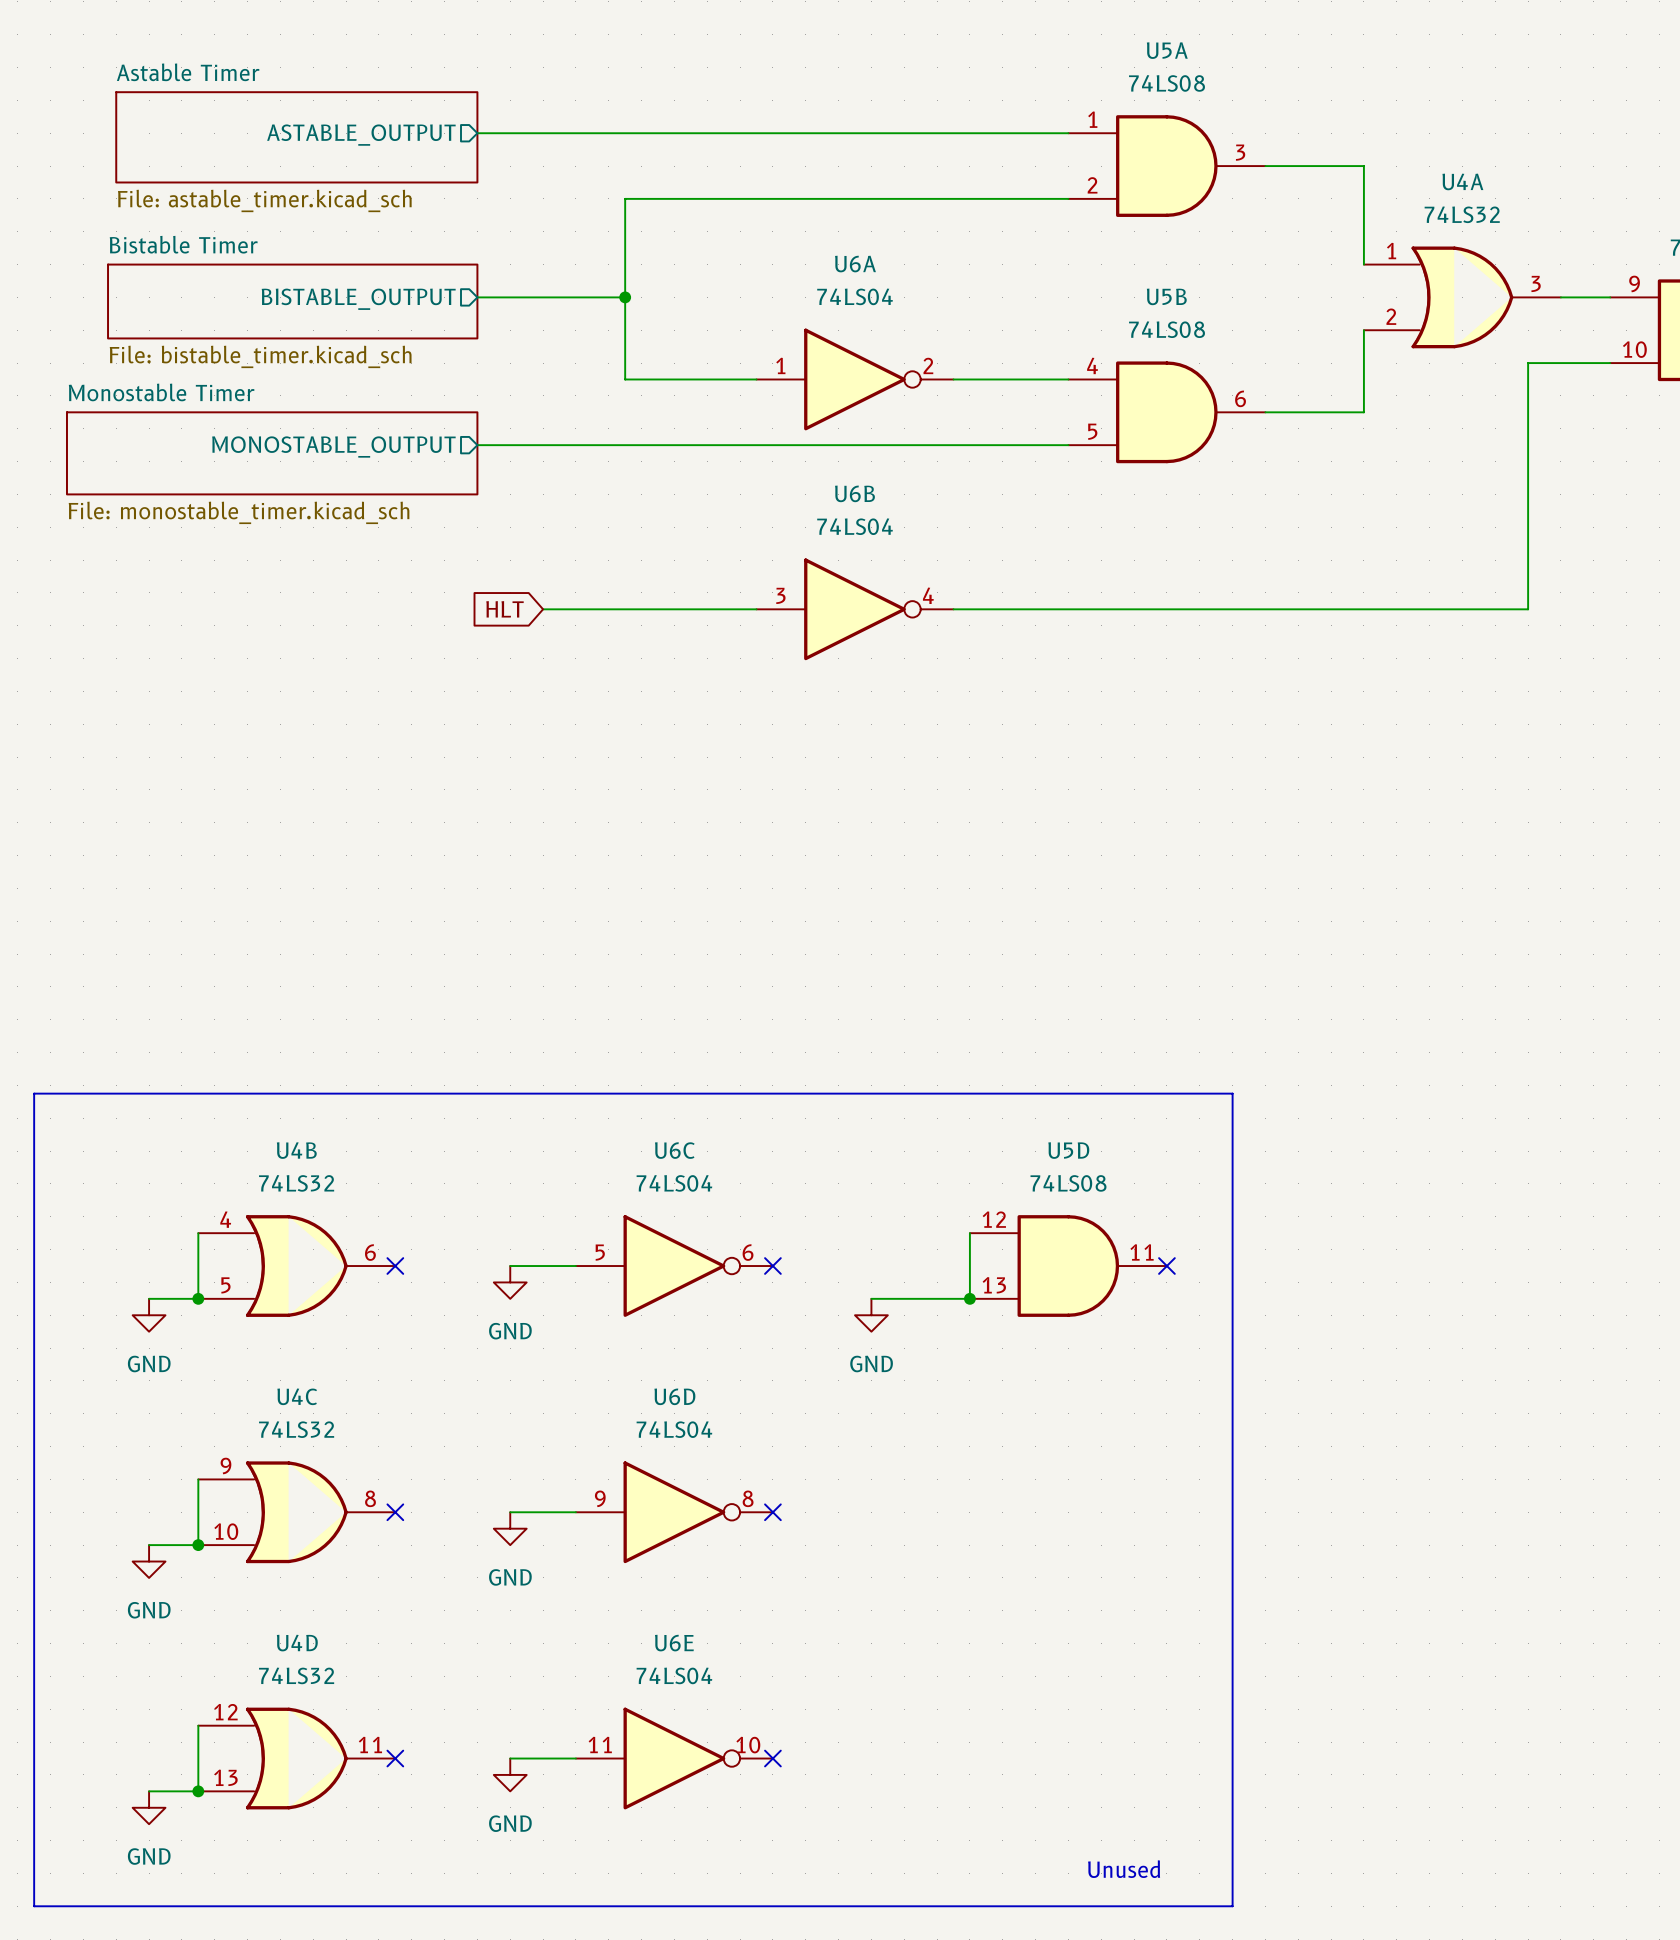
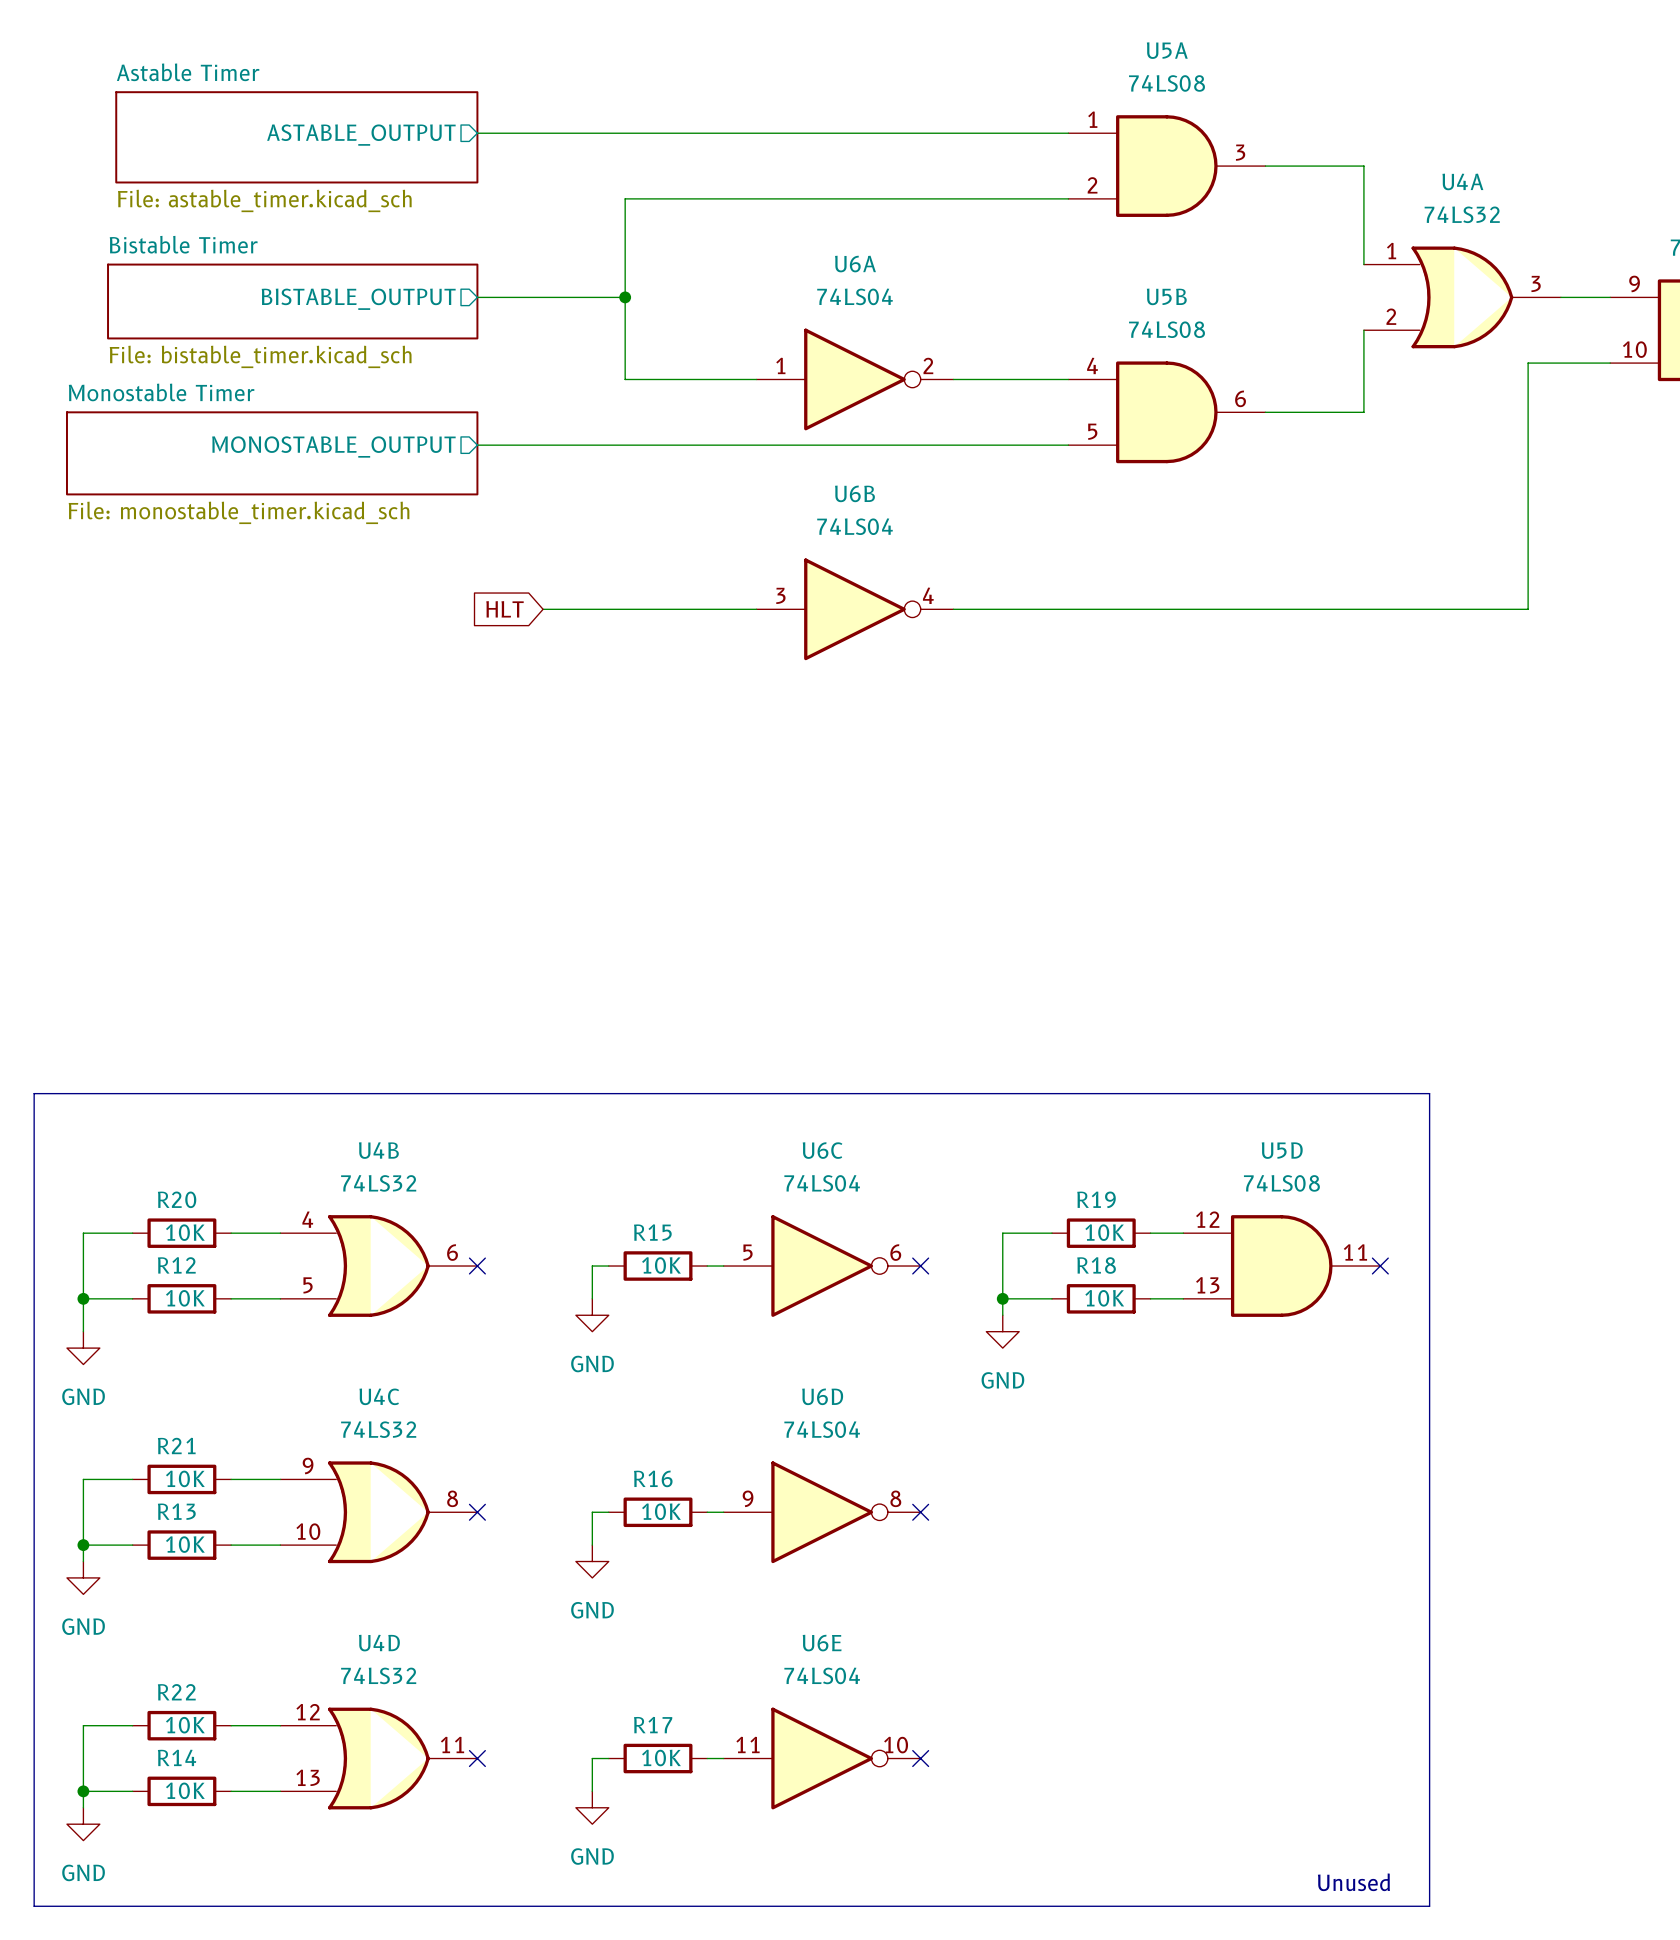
line: (1232, 1093) (1232, 1906) -> (1232, 1093) (1429, 1093) (1429, 1906) (1232, 1906)
wire: none -> (132, 1233) (83, 1233) (83, 1331)
R20: none -> 10K (181, 1233)
wire: (198, 1233) (198, 1298) (149, 1298) -> none
wire: (969, 1233) (969, 1298) (871, 1298) -> none
wire: none -> (1052, 1233) (1002, 1233) (1002, 1315)
R19: none -> 10K (1101, 1233)
wire: none -> (1150, 1233) (1183, 1233)
U4B position: (296, 1266) -> (378, 1266)
no-connect mark: (395, 1266) -> none
no-connect mark: none -> (477, 1266)
wire: (510, 1266) (575, 1266) -> none
wire: none -> (608, 1266) (592, 1266) (592, 1298)
R15: none -> 10K (658, 1266)
U6C position: (674, 1266) -> (822, 1266)
no-connect mark: (772, 1266) -> none
no-connect mark: none -> (920, 1266)
U5D position: (1068, 1266) -> (1281, 1266)
no-connect mark: (1166, 1266) -> none
no-connect mark: none -> (1380, 1266)
power symbol position: GND (510, 1282) -> GND (592, 1315)
wire: none -> (83, 1298) (132, 1298)
junction: none -> (83, 1298)
R12: none -> 10K (181, 1298)
junction: (198, 1298) -> none
junction position: (969, 1298) -> (1002, 1298)
R18: none -> 10K (1101, 1298)
wire: none -> (1150, 1298) (1183, 1298)
power symbol position: GND (149, 1315) -> GND (83, 1348)
power symbol position: GND (871, 1315) -> GND (1002, 1331)
wire: none -> (132, 1479) (83, 1479) (83, 1561)
R21: none -> 10K (181, 1479)
wire: (198, 1479) (198, 1545) (149, 1545) -> none
U4C position: (296, 1512) -> (378, 1512)
no-connect mark: (395, 1512) -> none
no-connect mark: none -> (477, 1512)
wire: (510, 1512) (575, 1512) -> none
wire: none -> (608, 1512) (592, 1512) (592, 1545)
R16: none -> 10K (658, 1512)
U6D position: (674, 1512) -> (822, 1512)
no-connect mark: (772, 1512) -> none
no-connect mark: none -> (920, 1512)
power symbol position: GND (510, 1528) -> GND (592, 1561)
wire: none -> (83, 1545) (132, 1545)
junction: none -> (83, 1545)
R13: none -> 10K (181, 1545)
junction: (198, 1545) -> none
power symbol position: GND (149, 1561) -> GND (83, 1577)
wire: none -> (132, 1725) (83, 1725) (83, 1807)
R22: none -> 10K (181, 1725)
wire: (198, 1725) (198, 1791) (149, 1791) -> none
U4D position: (296, 1758) -> (378, 1758)
no-connect mark: (395, 1758) -> none
no-connect mark: none -> (477, 1758)
wire: (510, 1758) (575, 1758) -> none
wire: none -> (608, 1758) (592, 1758) (592, 1791)
R17: none -> 10K (658, 1758)
U6E position: (674, 1758) -> (822, 1758)
no-connect mark: (772, 1758) -> none
no-connect mark: none -> (920, 1758)
power symbol position: GND (510, 1774) -> GND (592, 1807)
wire: none -> (83, 1791) (132, 1791)
junction: none -> (83, 1791)
R14: none -> 10K (181, 1791)
junction: (198, 1791) -> none
power symbol position: GND (149, 1807) -> GND (83, 1824)
text position: Unused (1124, 1869) -> Unused (1353, 1882)

